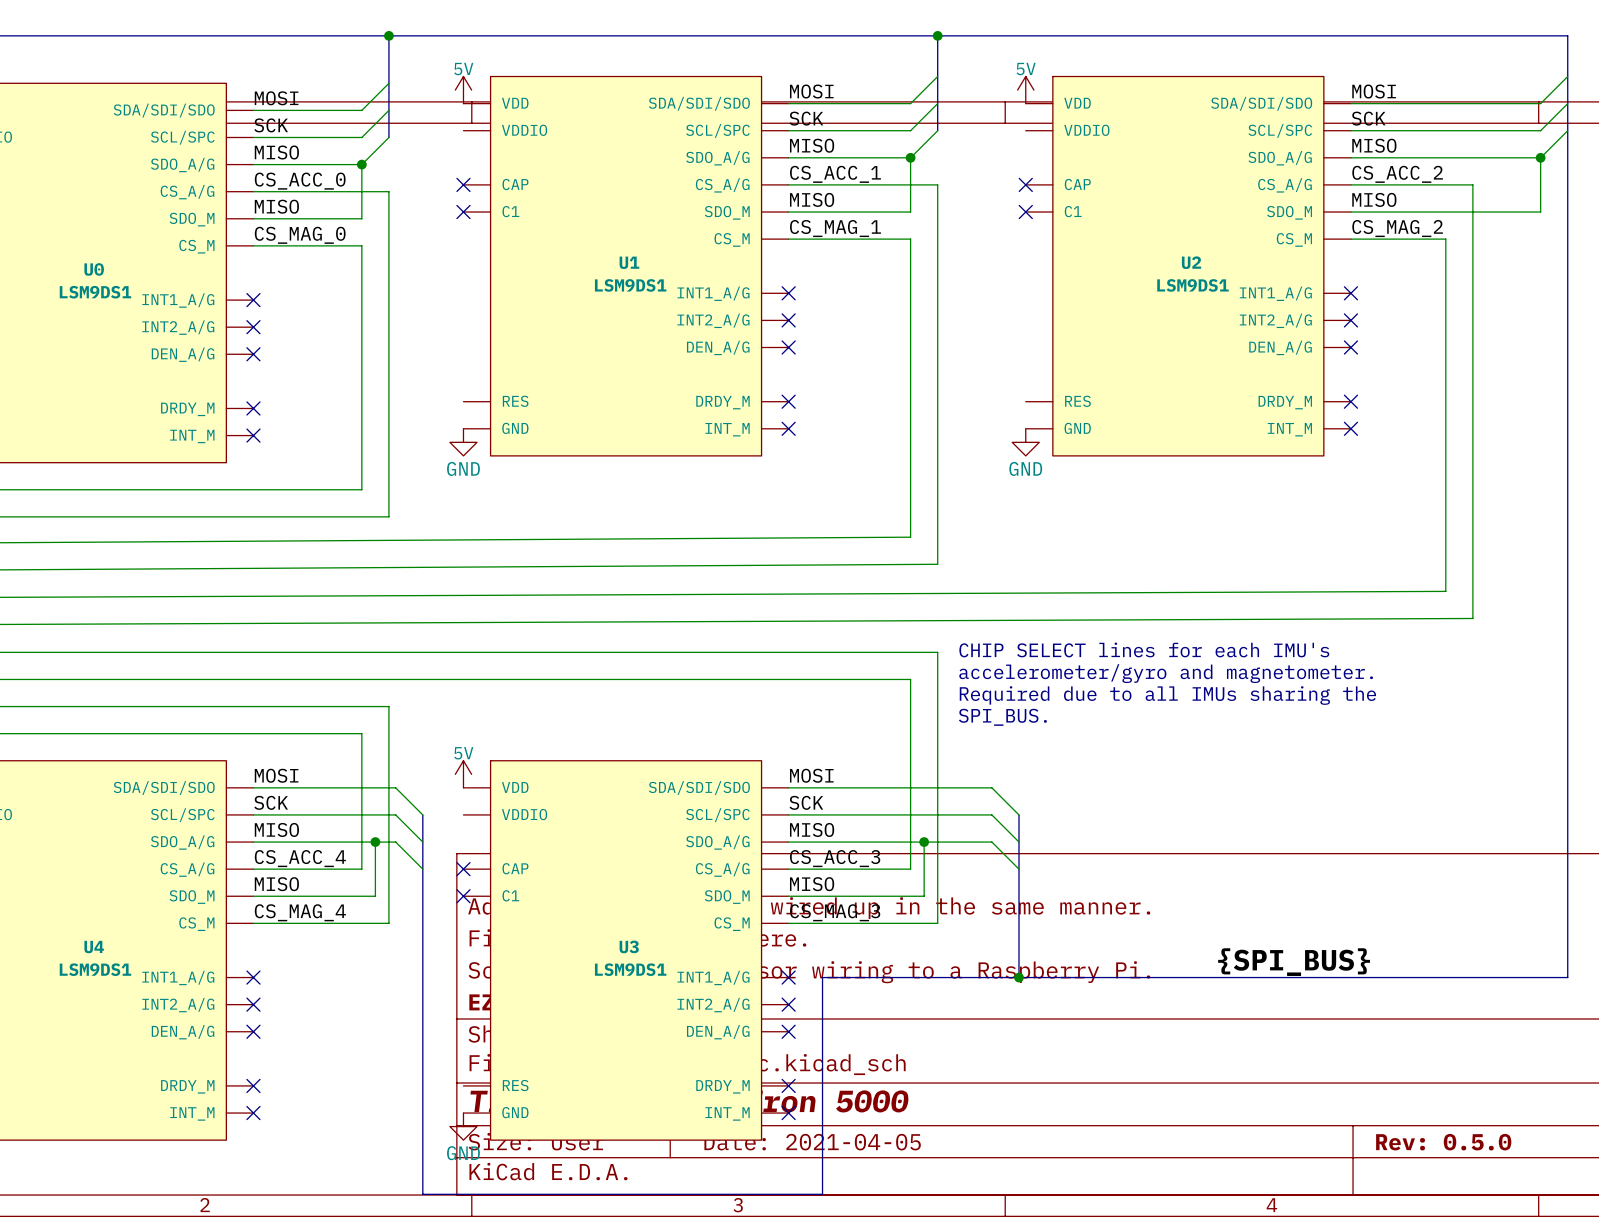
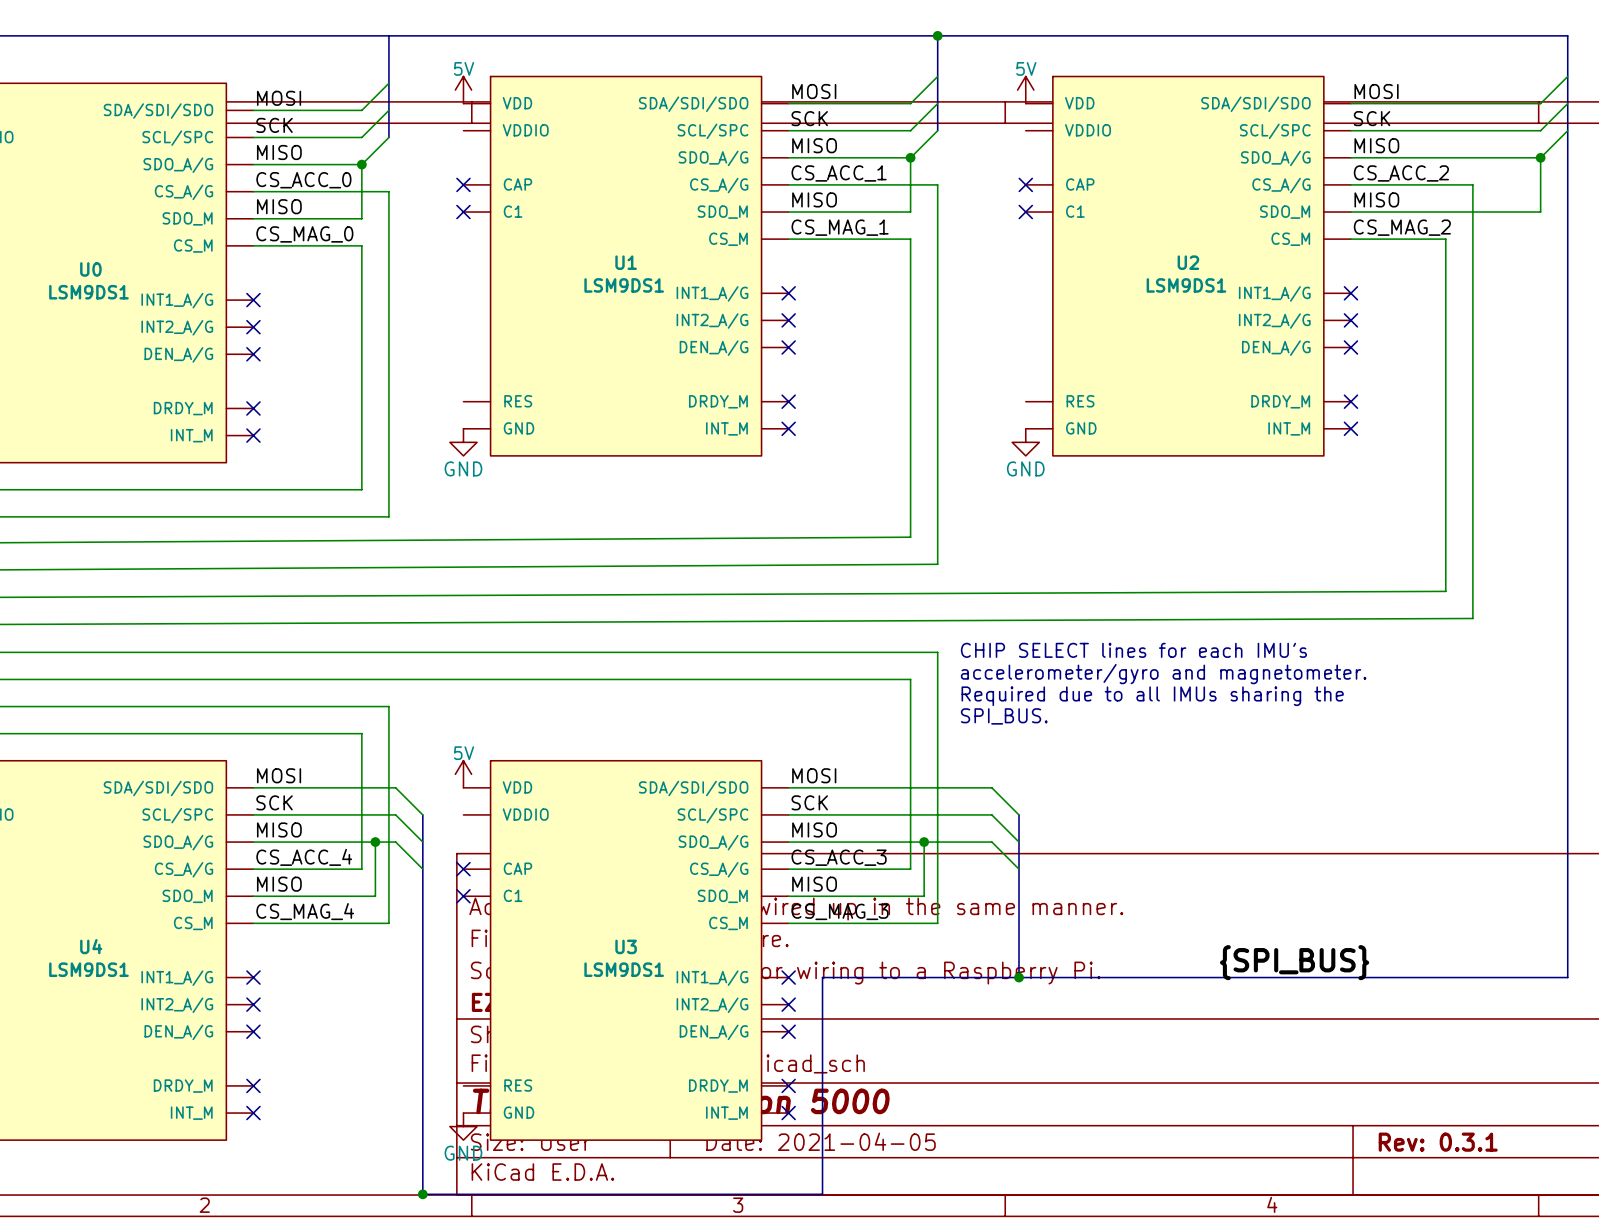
junction: (388, 35) -> none
title block: Rev: 0.5.0 (1443, 1142) -> Rev: 0.3.1 (1438, 1142)
junction: none -> (422, 1194)

